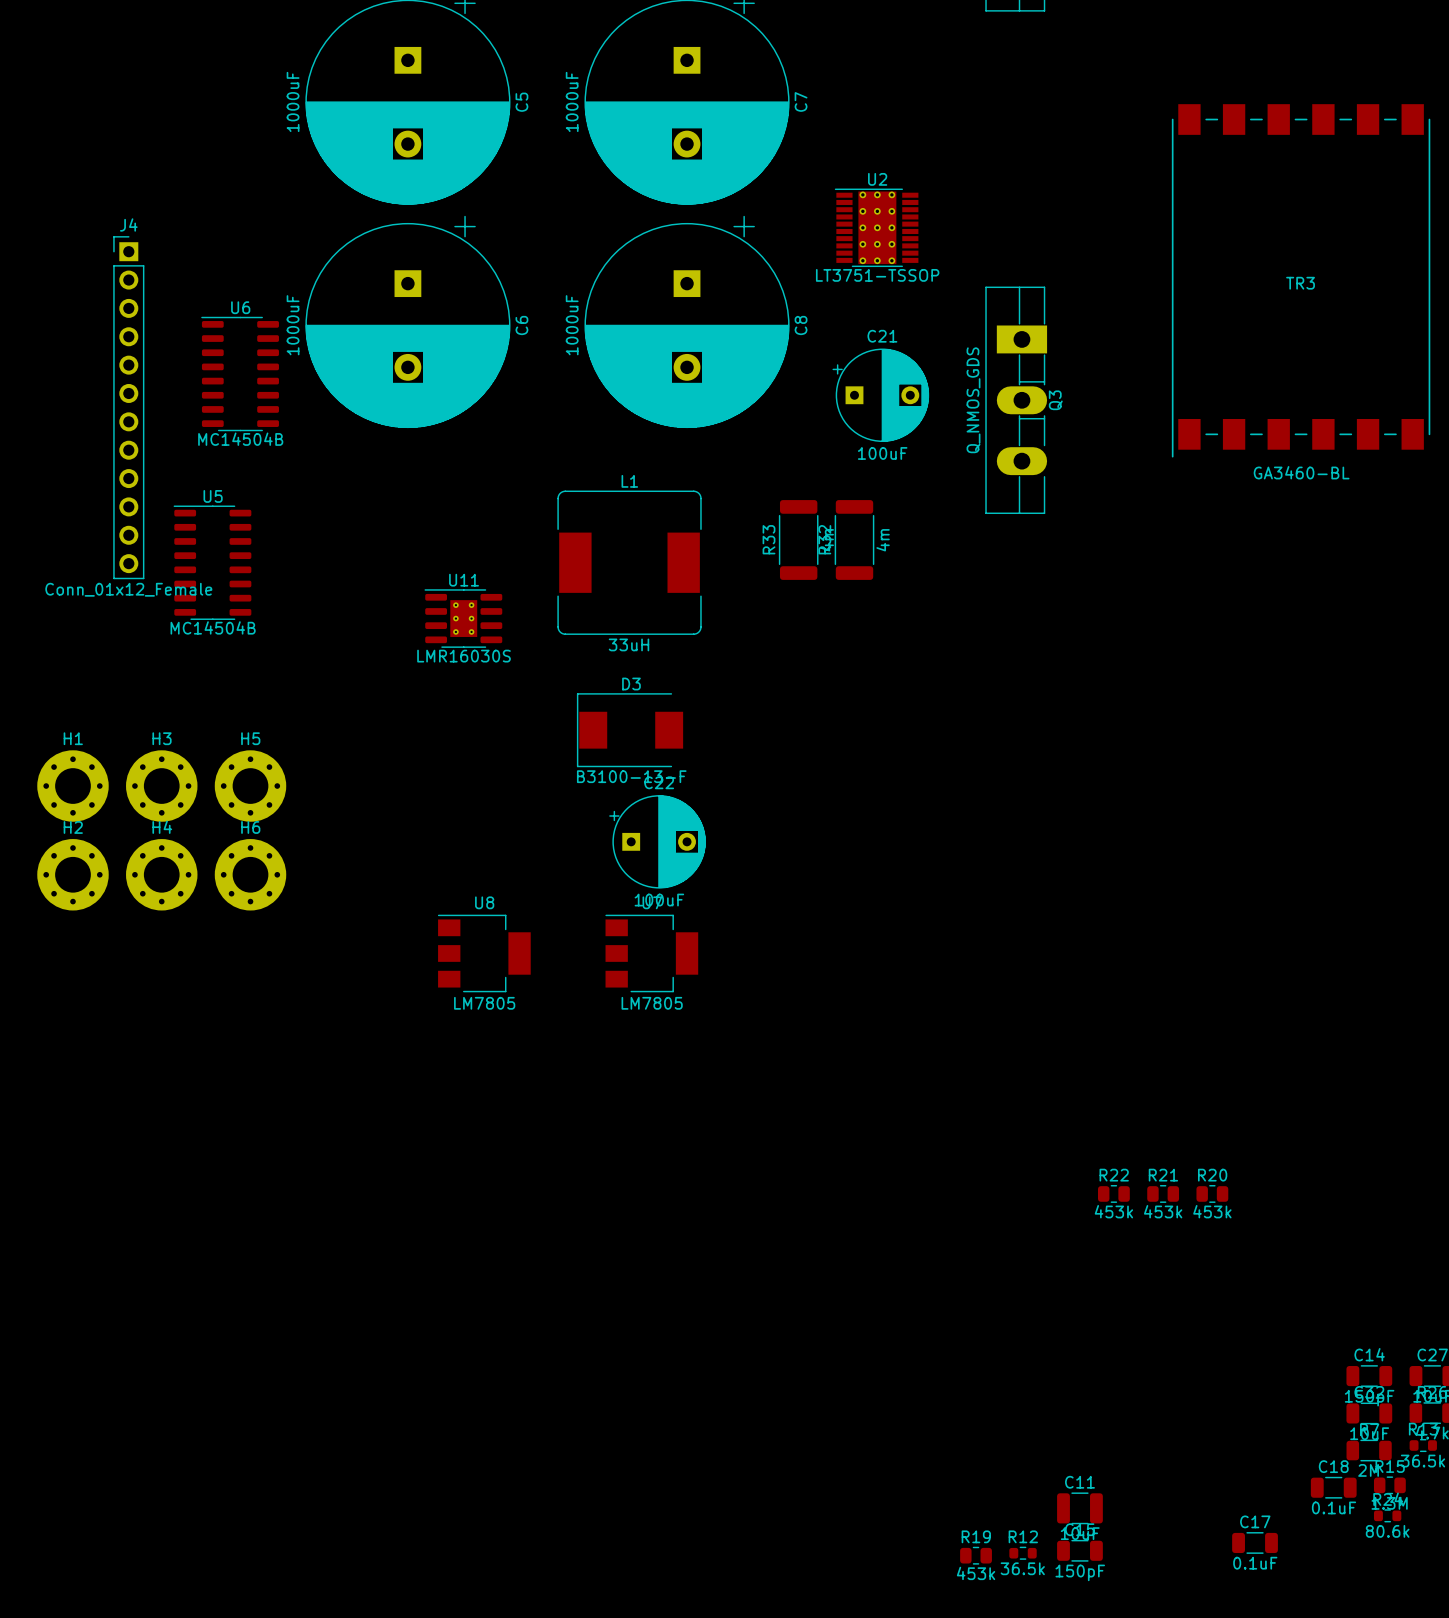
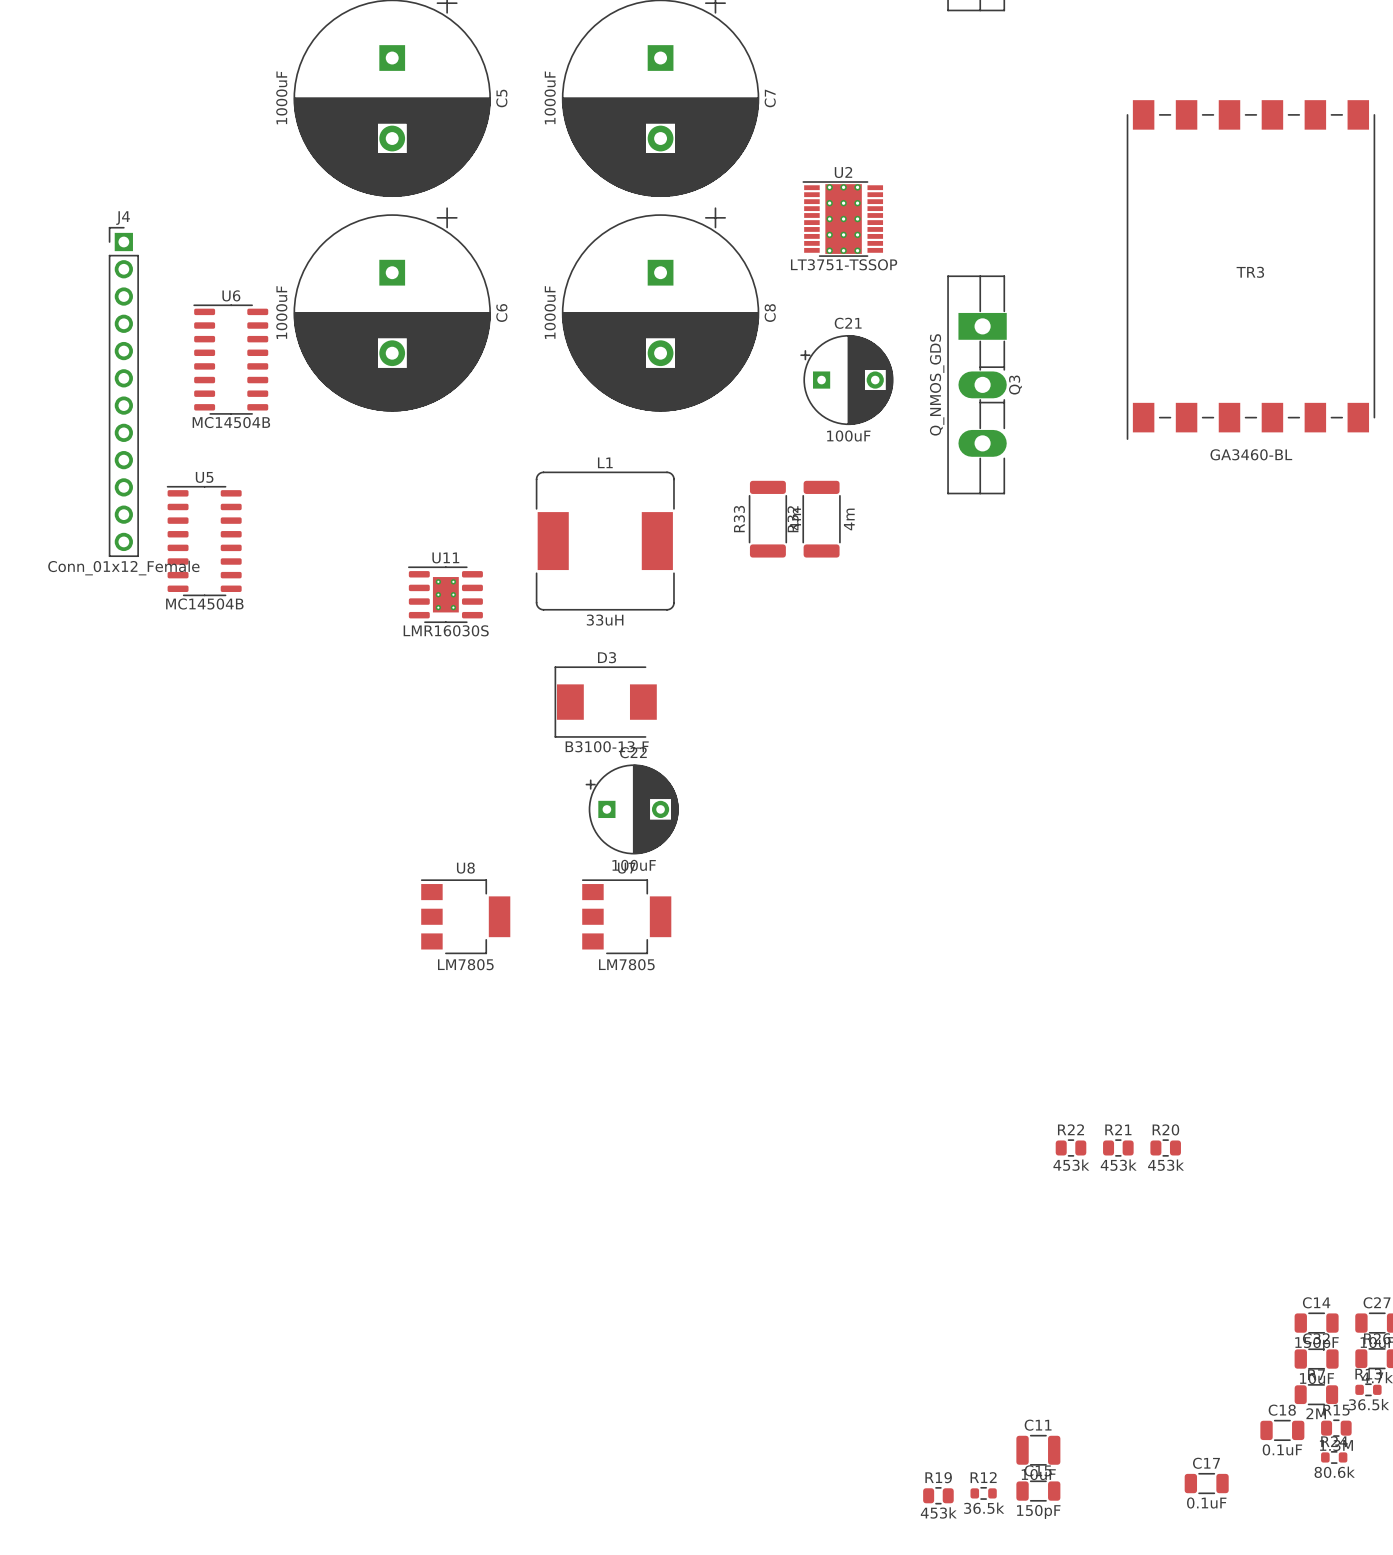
H1: (72, 786) -> none
H3: (161, 786) -> none
H5: (250, 786) -> none
H2: (72, 874) -> none
H4: (161, 874) -> none
H6: (250, 874) -> none

